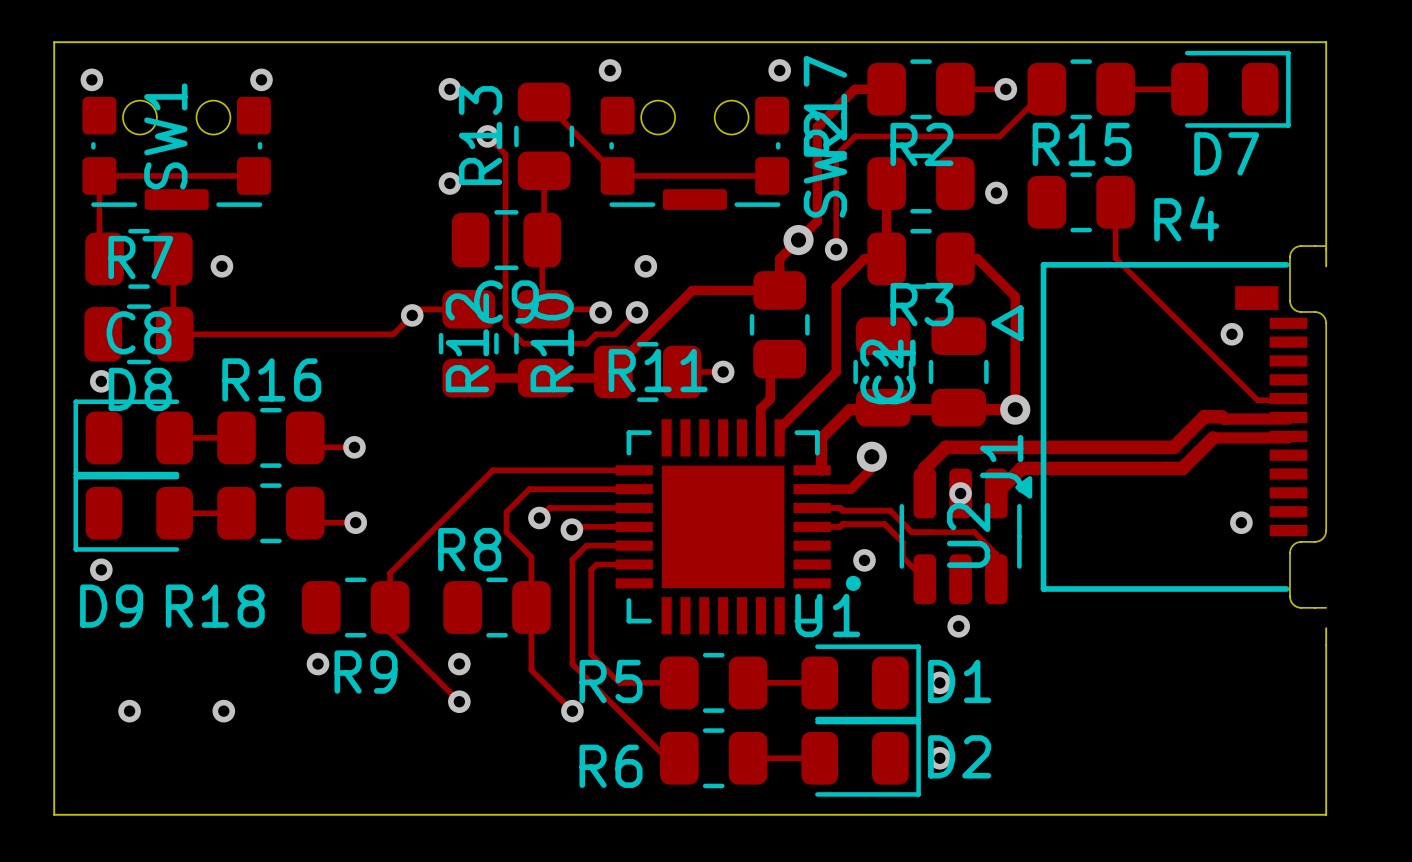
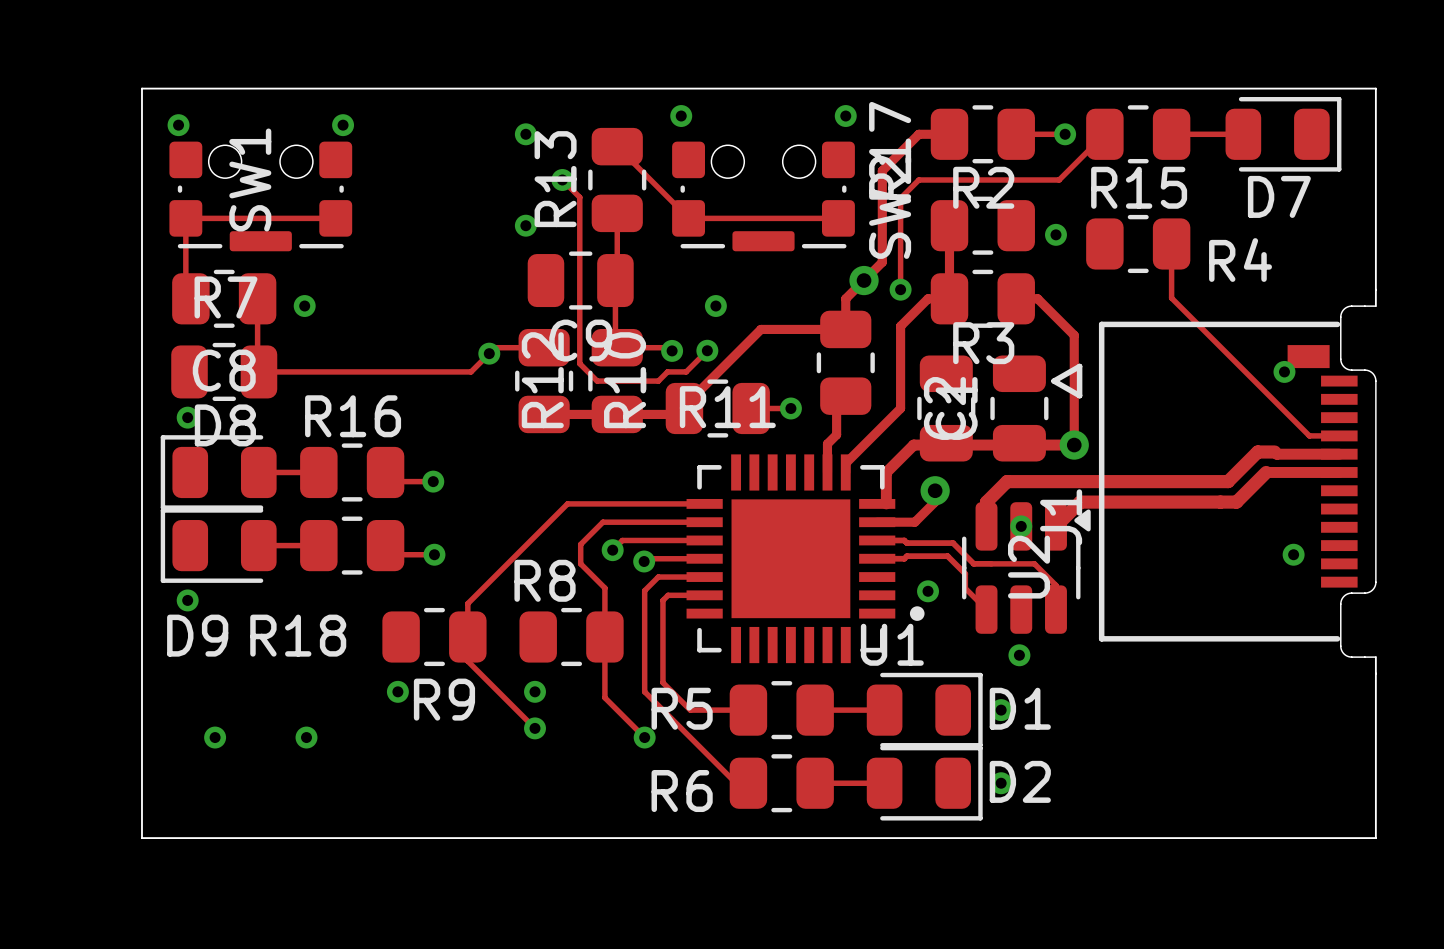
J1 position: (1158, 426) -> (1213, 481)

